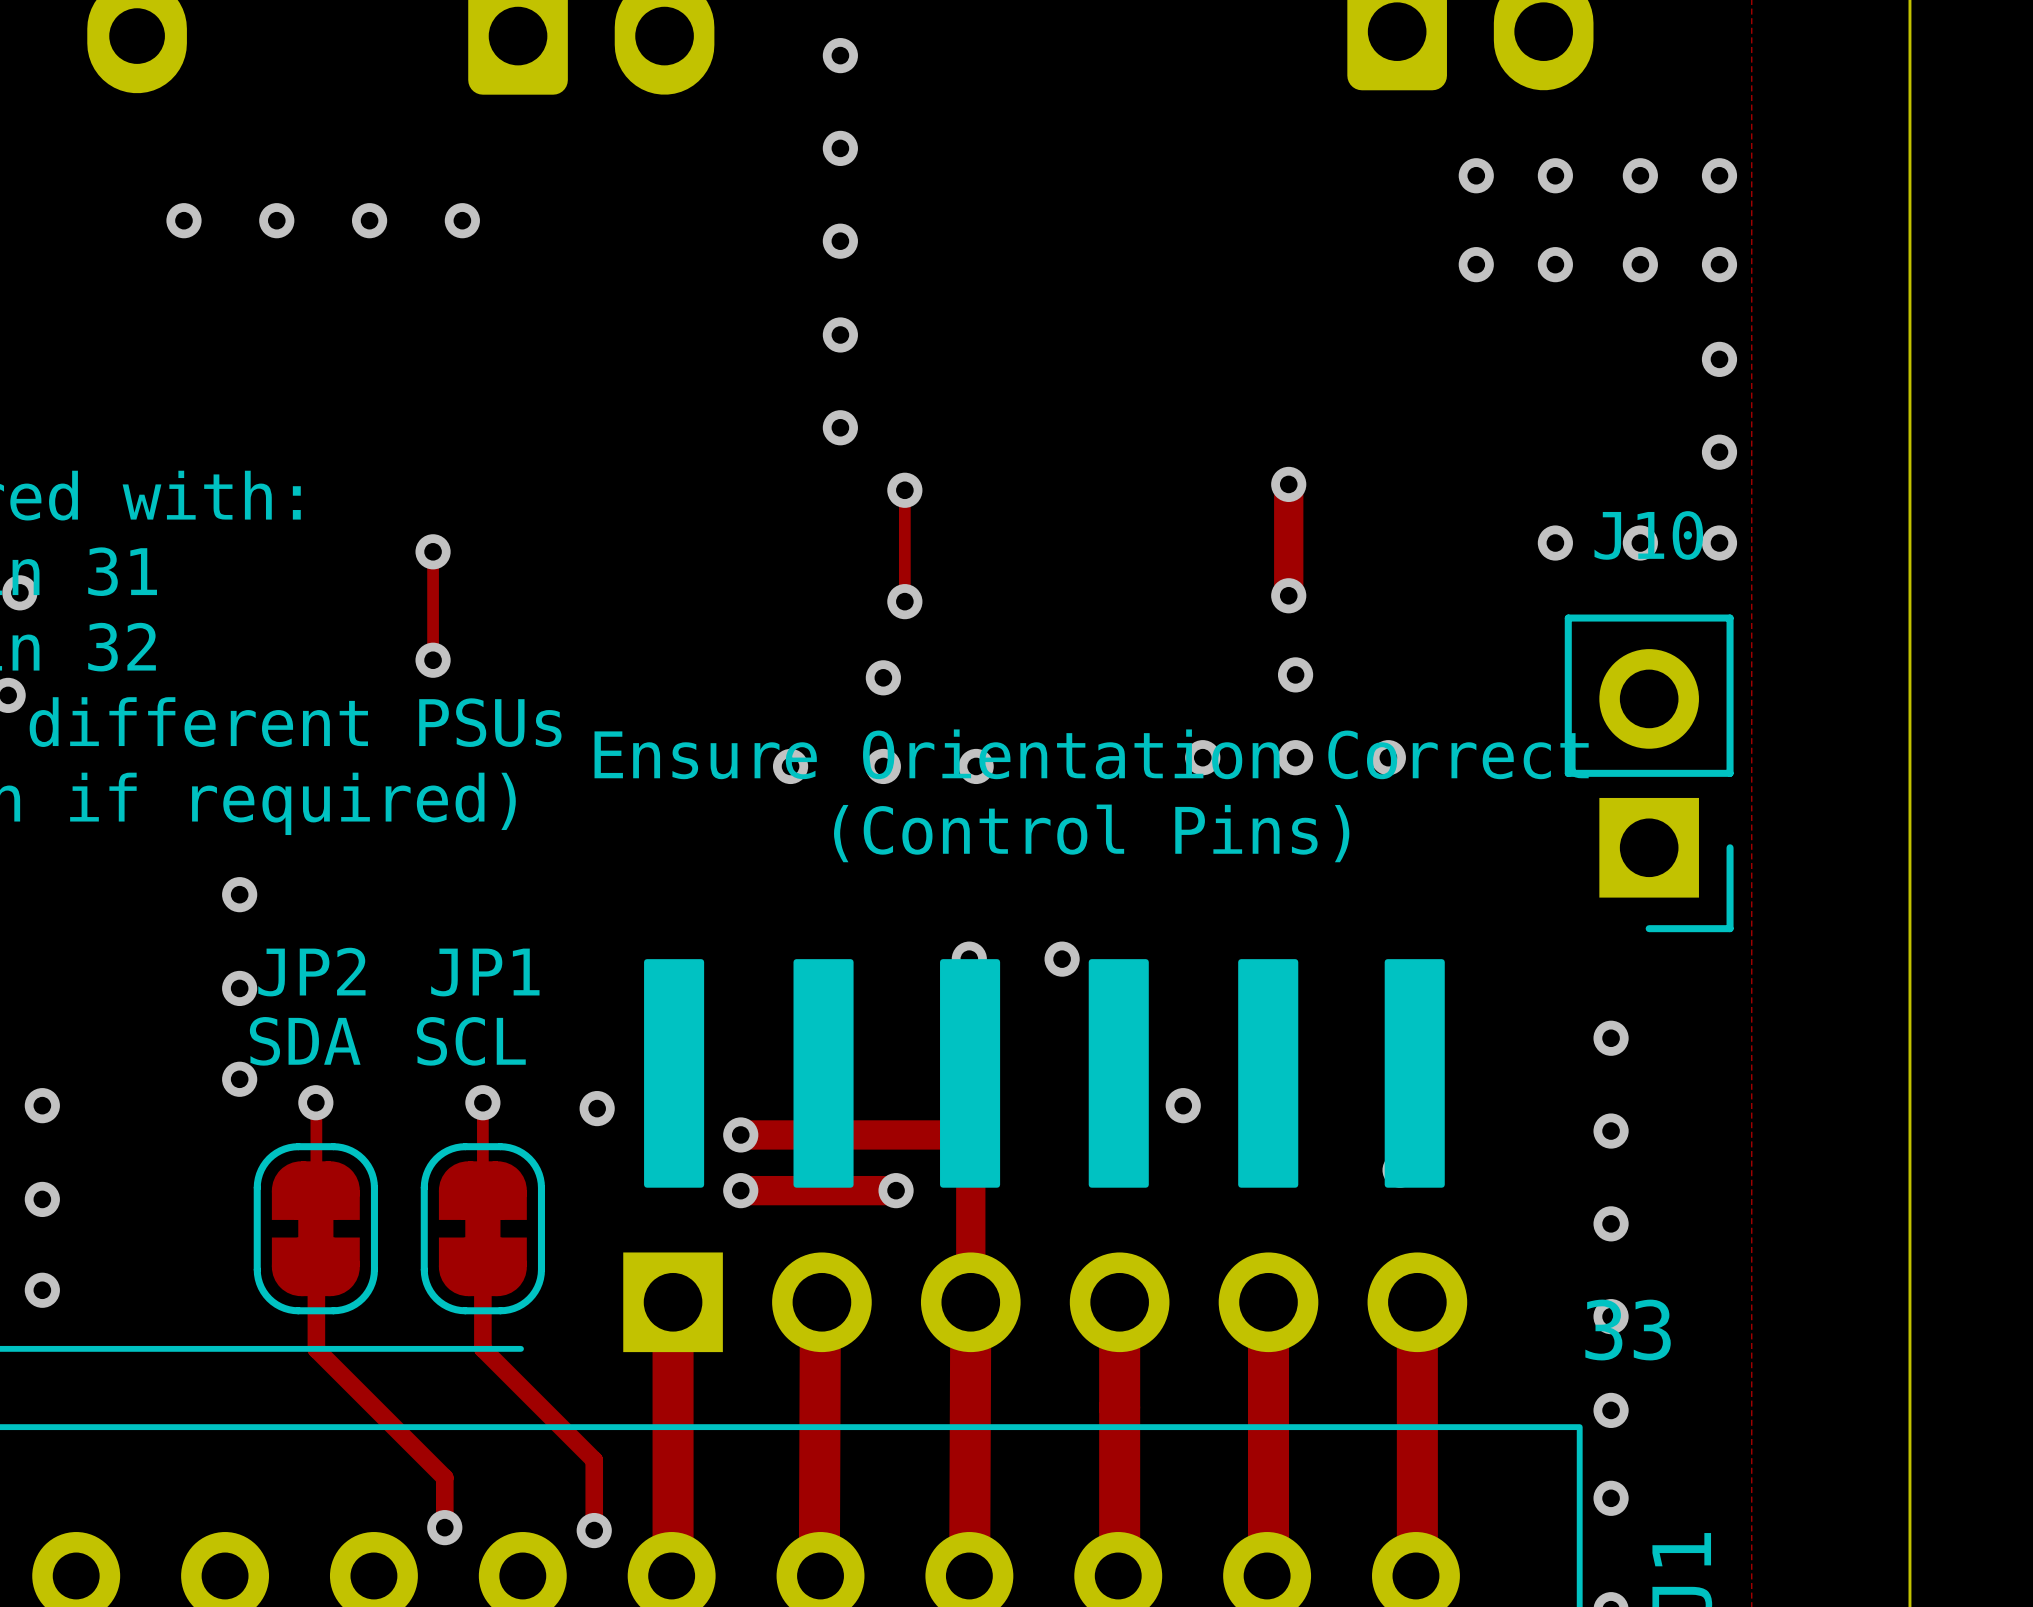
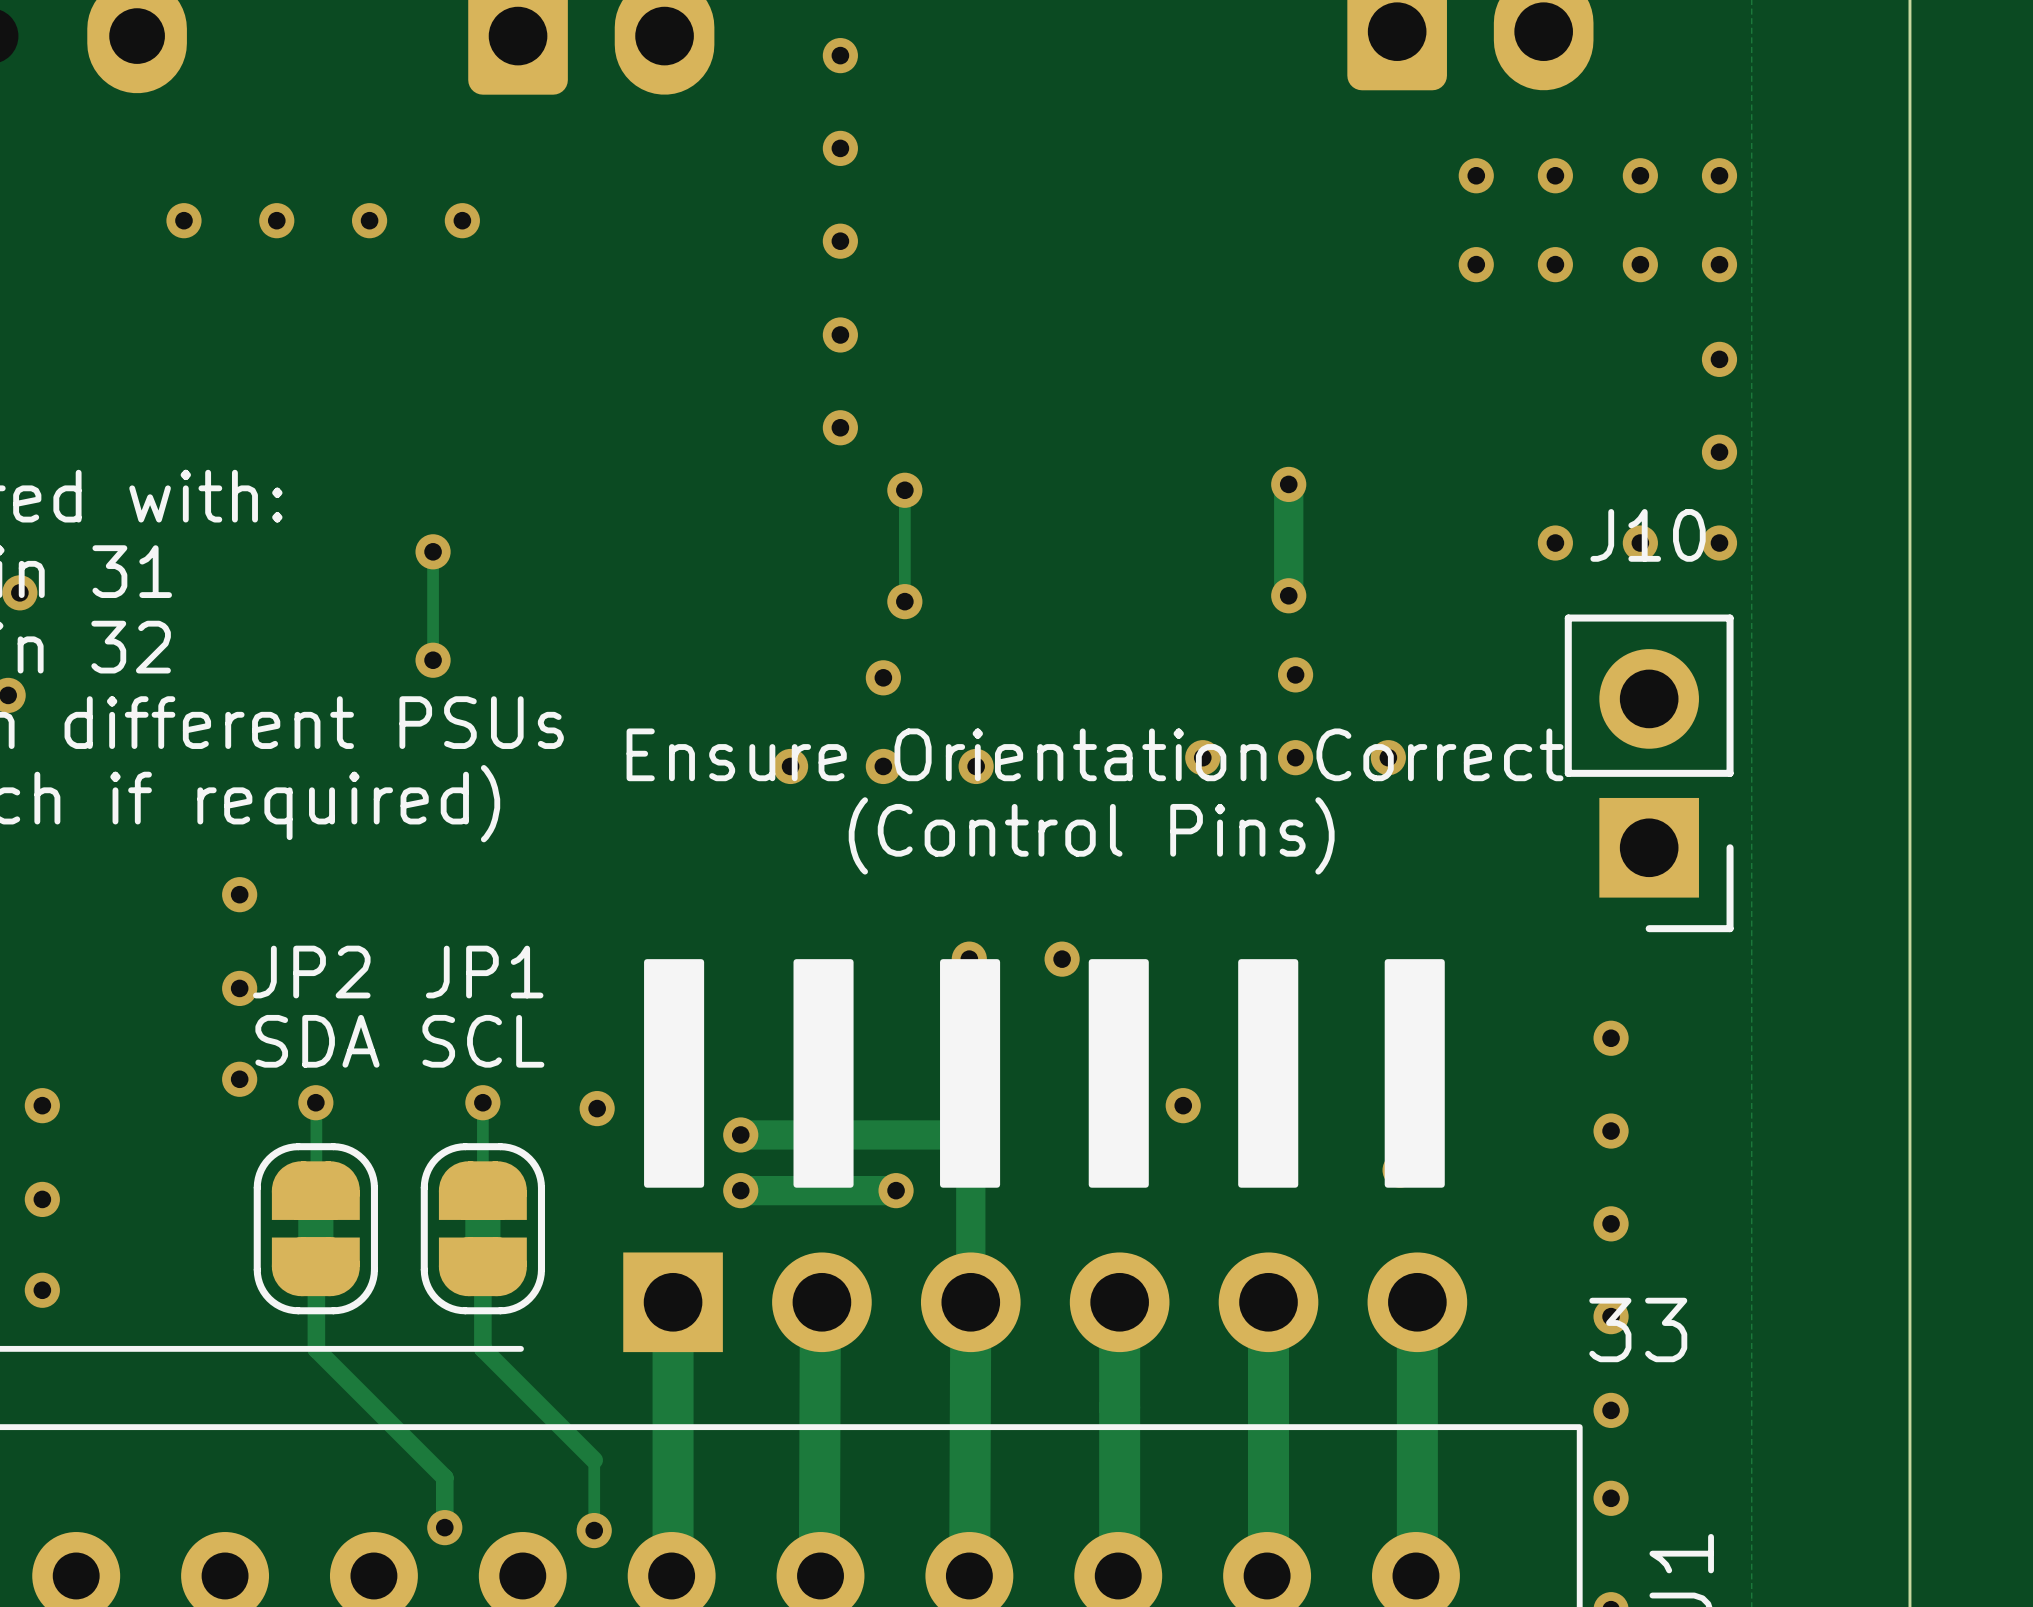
track width: thick (594, 1460) (594, 1530) -> thin (594, 1460) (594, 1530)

